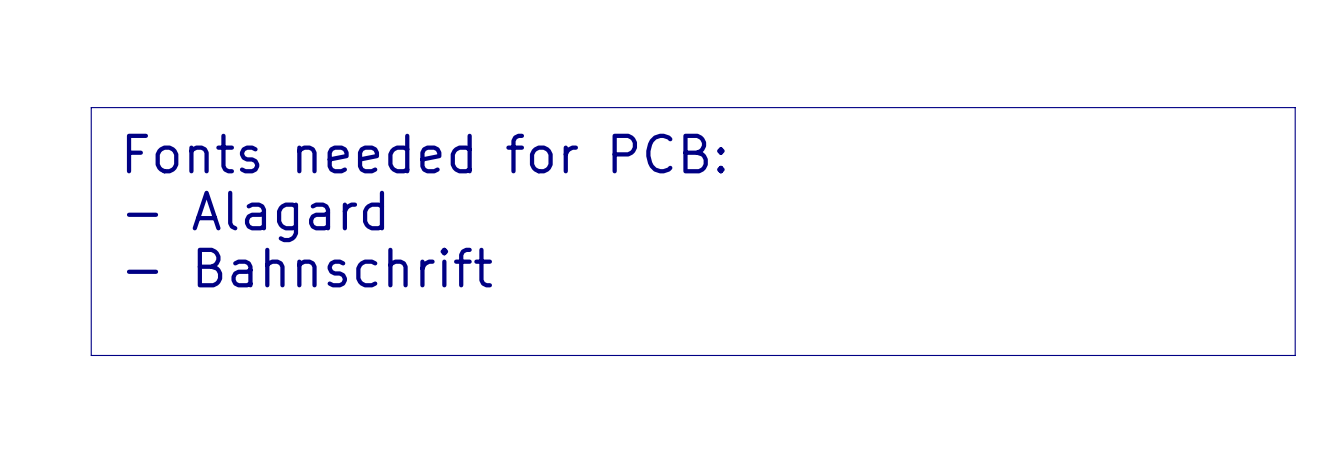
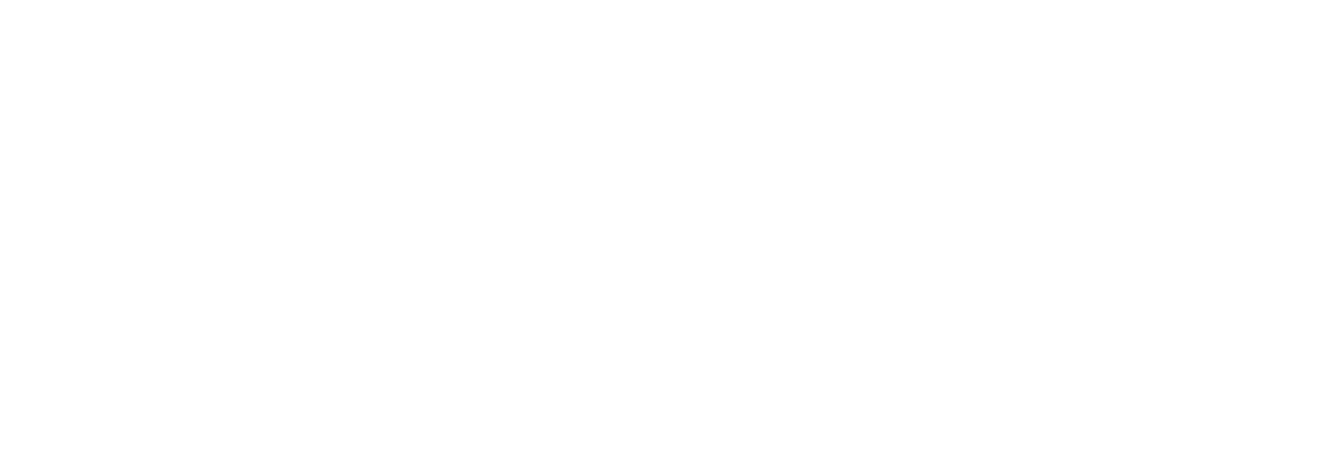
line: (91, 107) (1295, 107) (1295, 355) (91, 355) (91, 107) -> none
text: Fonts needed for PCB: (425, 153) -> none
text: - Alagard (255, 216) -> none
text: - Bahnschrift (309, 267) -> none

